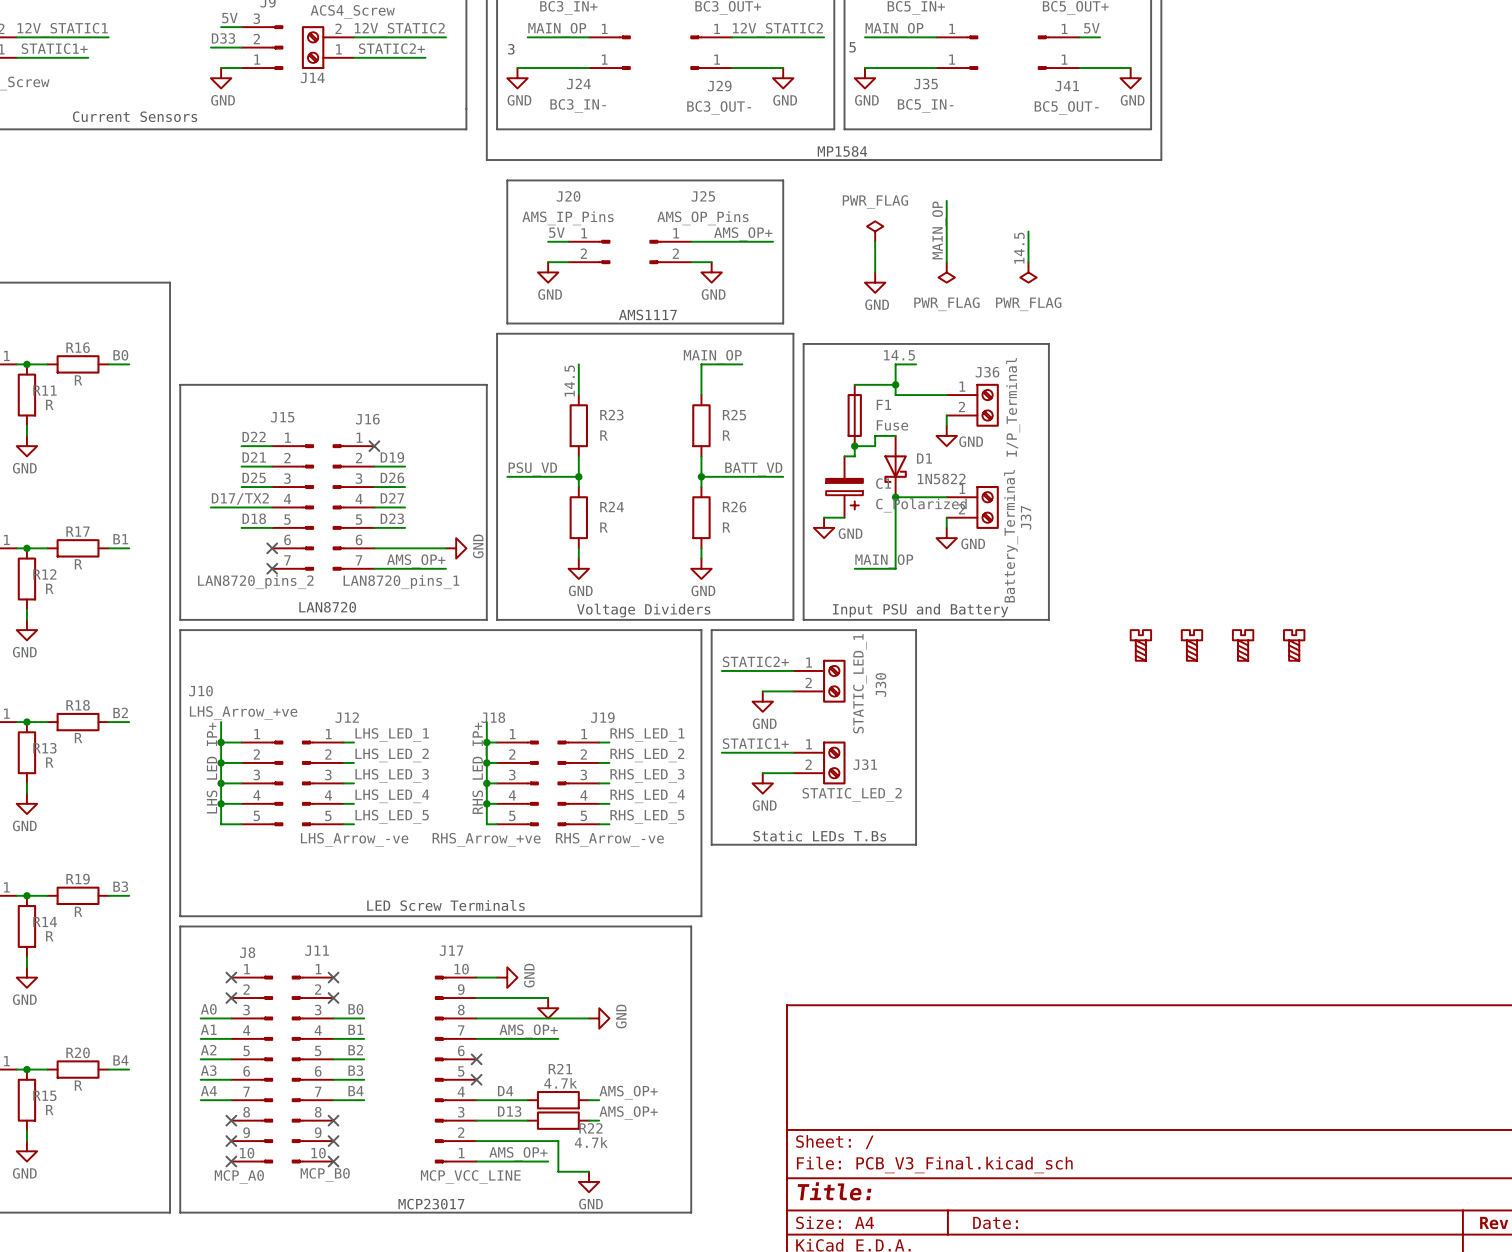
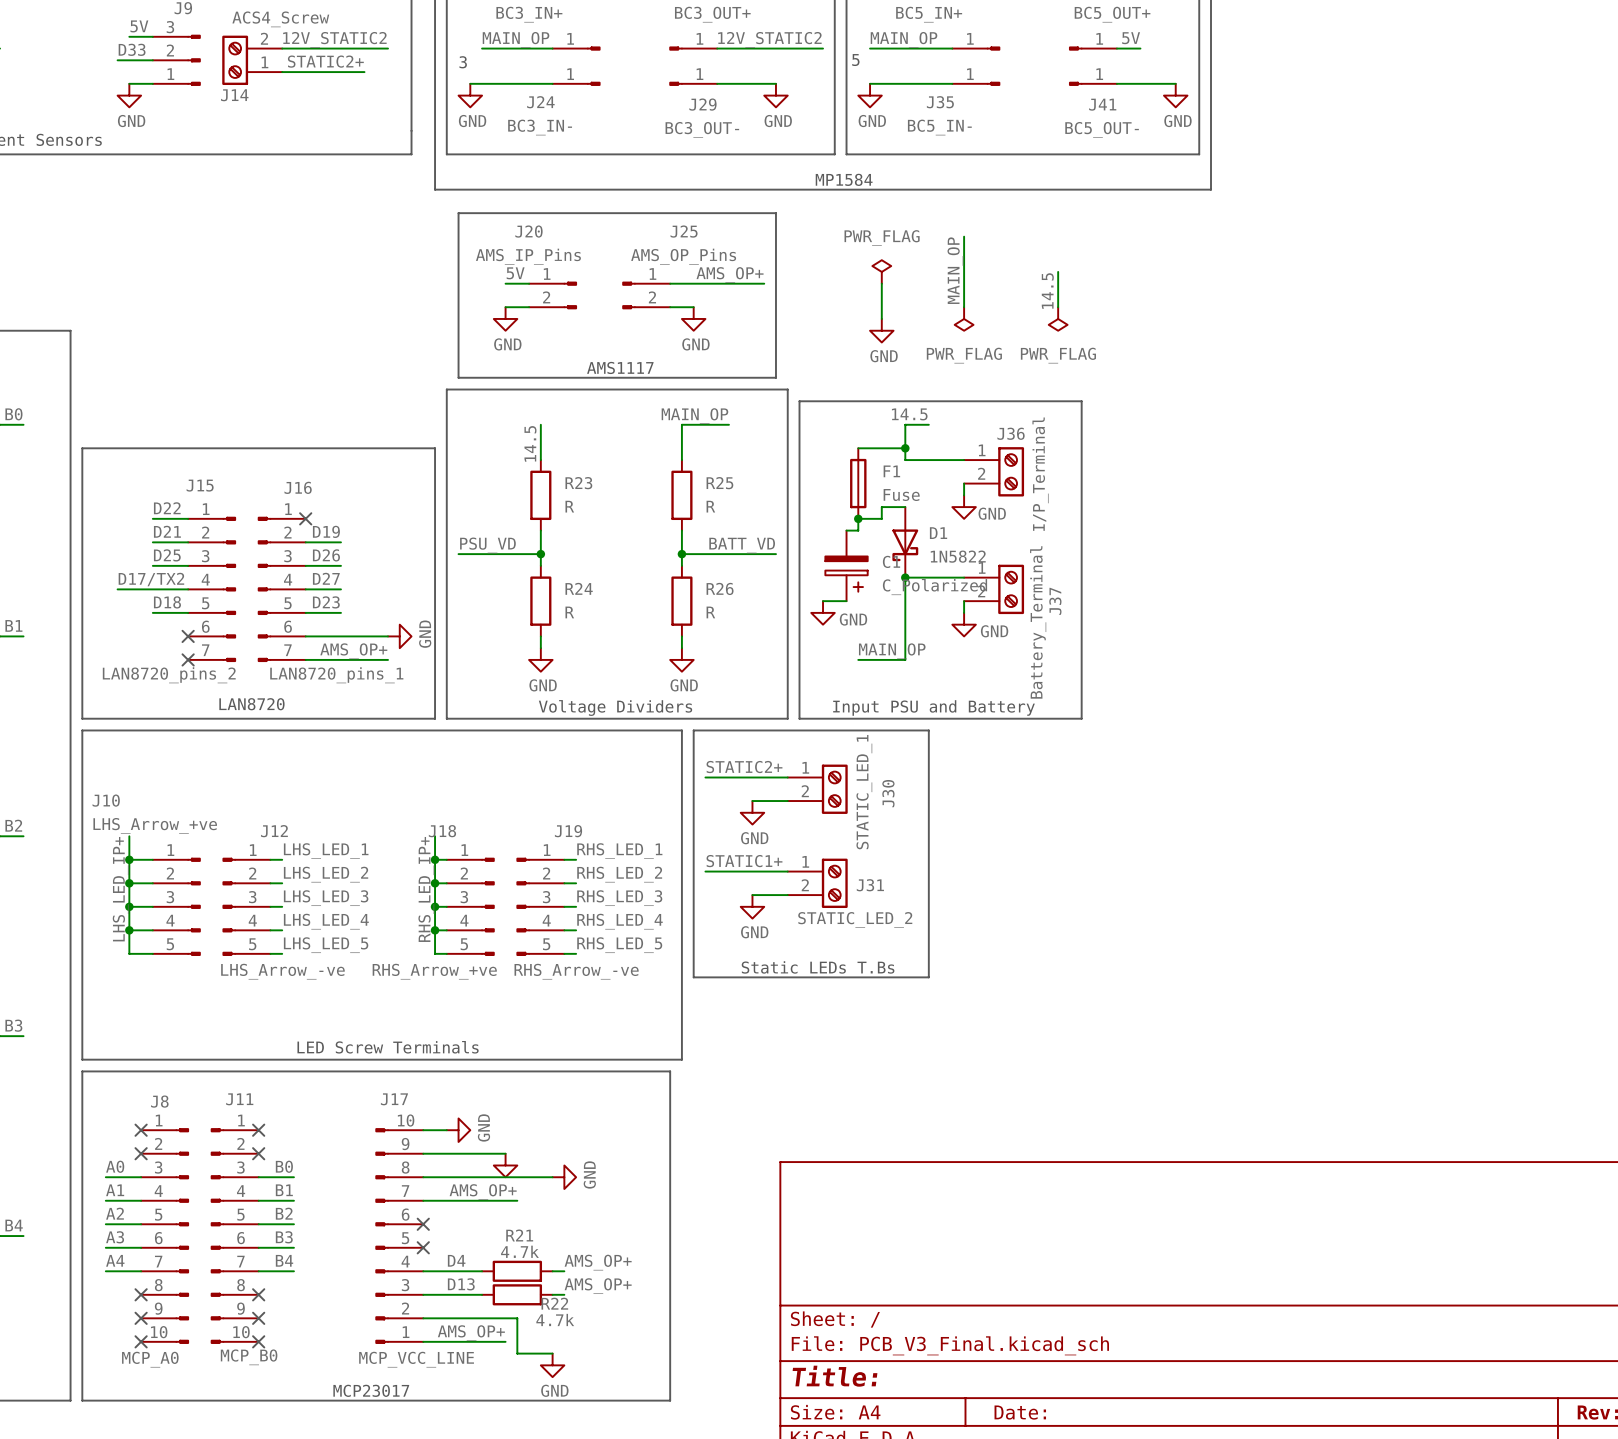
part: (1140, 645) -> none
part: (1191, 645) -> none
part: (1243, 645) -> none
part: (1294, 645) -> none

